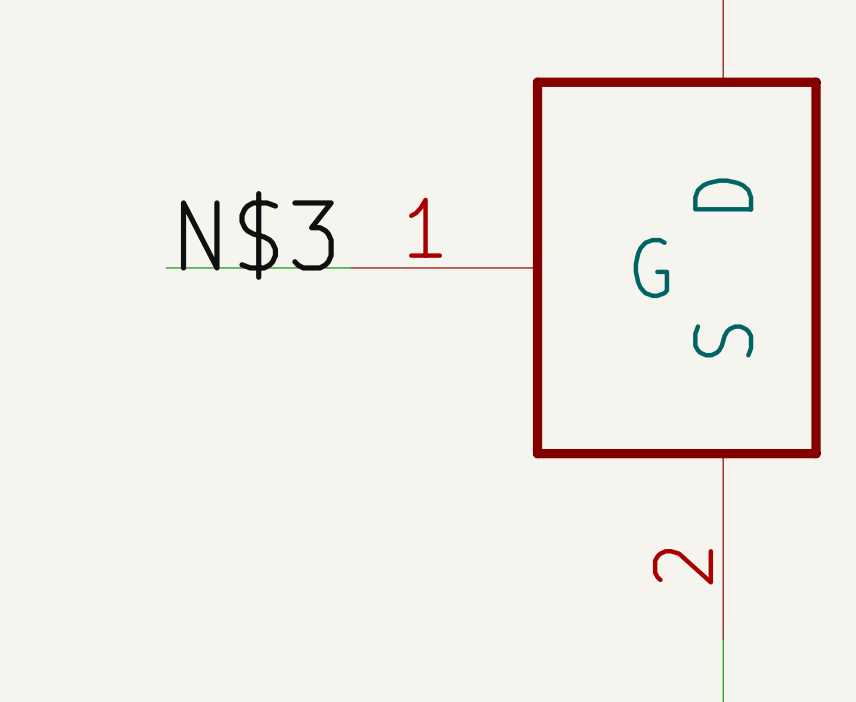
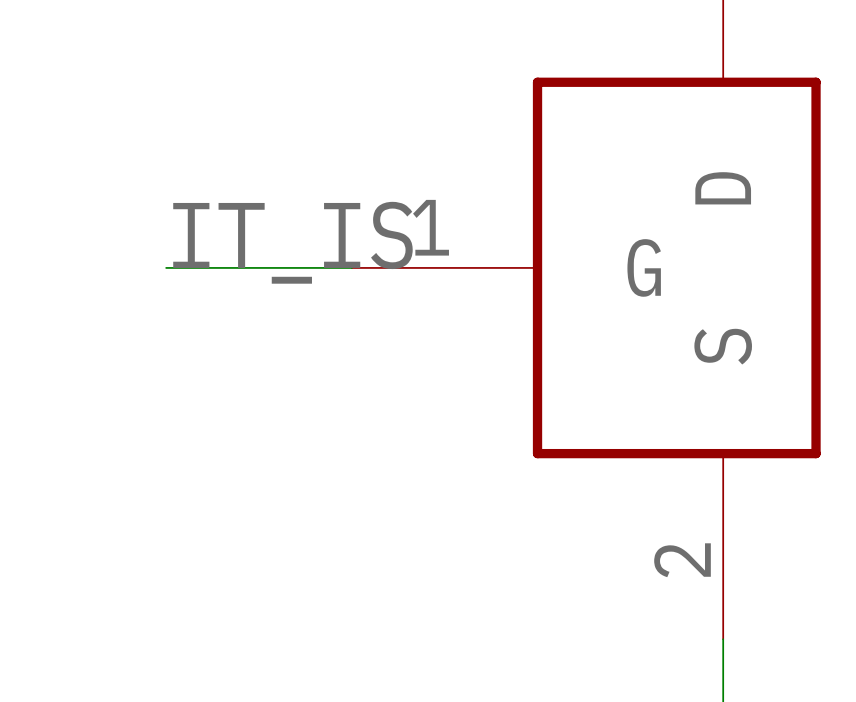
label: N$3 (257, 235) -> IT_IS (292, 242)

